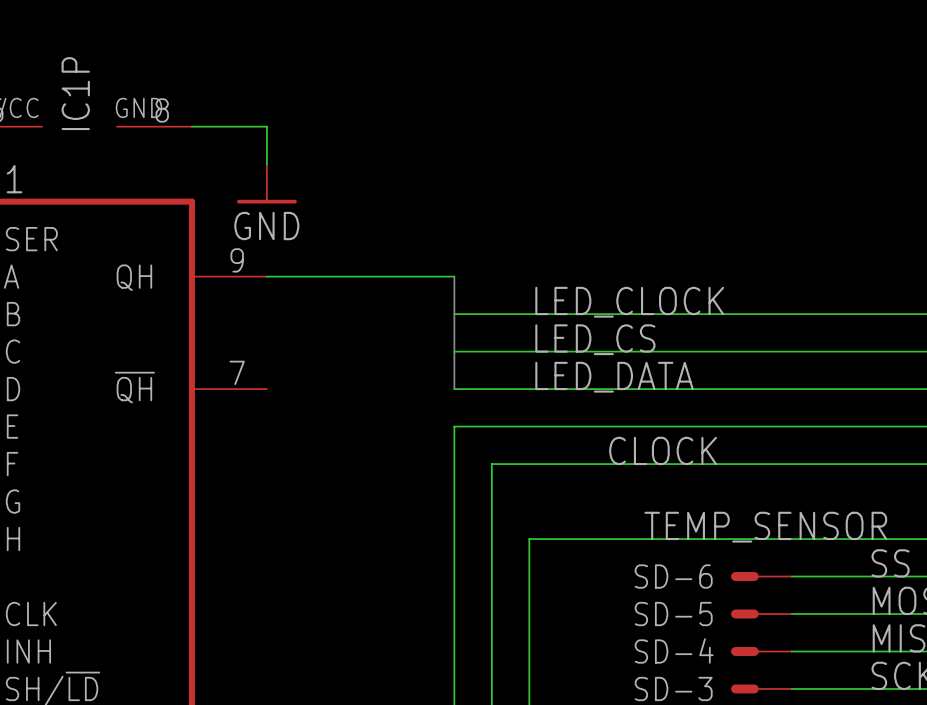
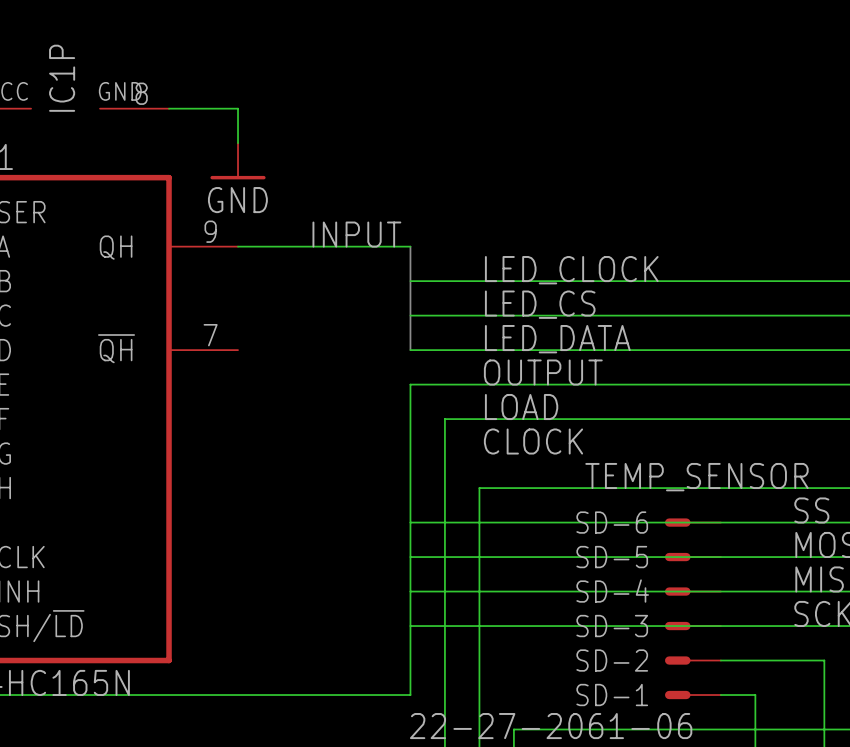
label: none -> INPUT (356, 234)
label: none -> OUTPUT (543, 372)
label: none -> LOAD (521, 407)
label position: CLOCK (663, 450) -> CLOCK (533, 441)
wire: none -> (410, 522) (720, 522)
wire: none -> (410, 557) (720, 557)
wire: none -> (410, 591) (720, 591)
wire: none -> (410, 626) (720, 626)

